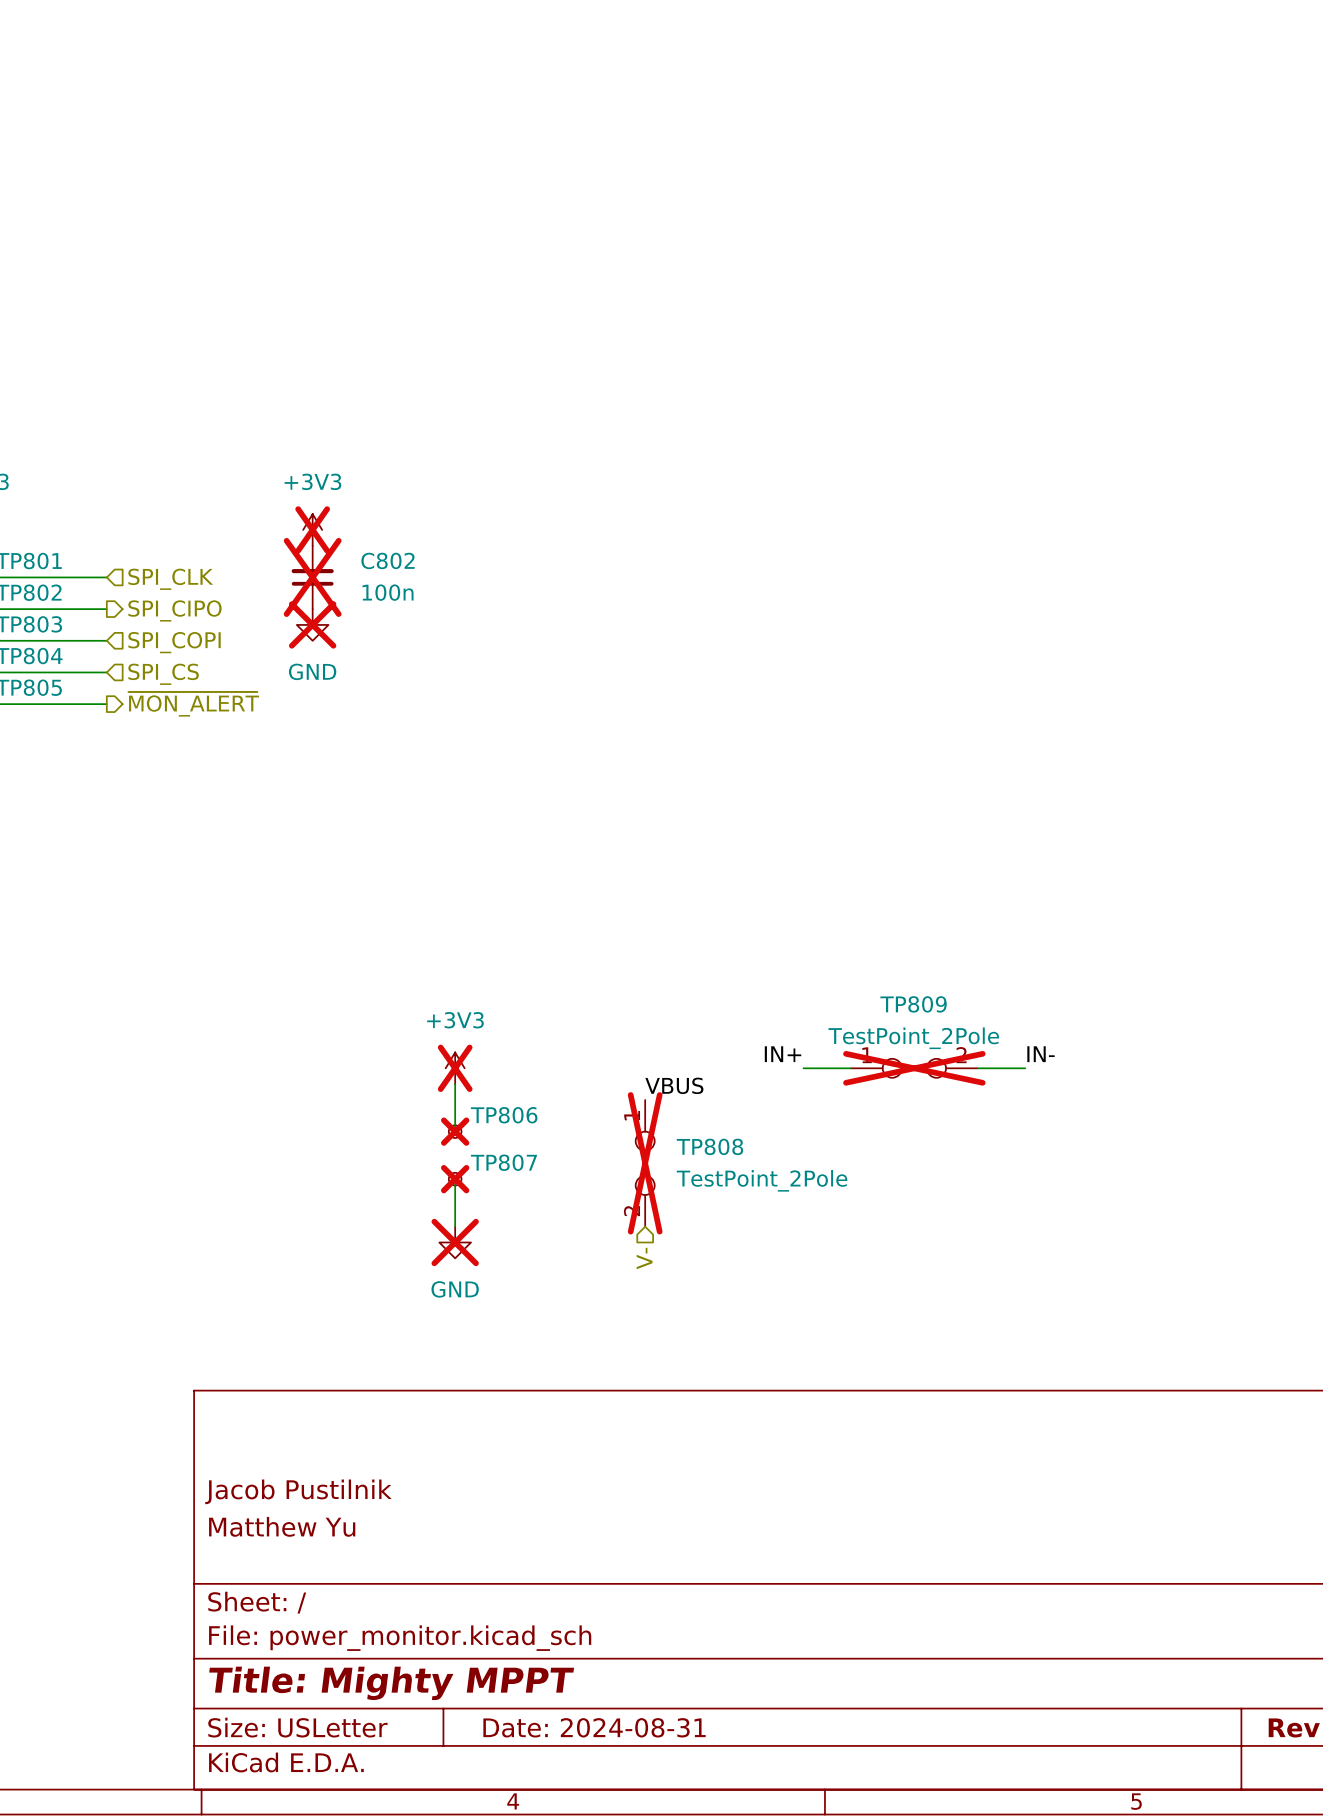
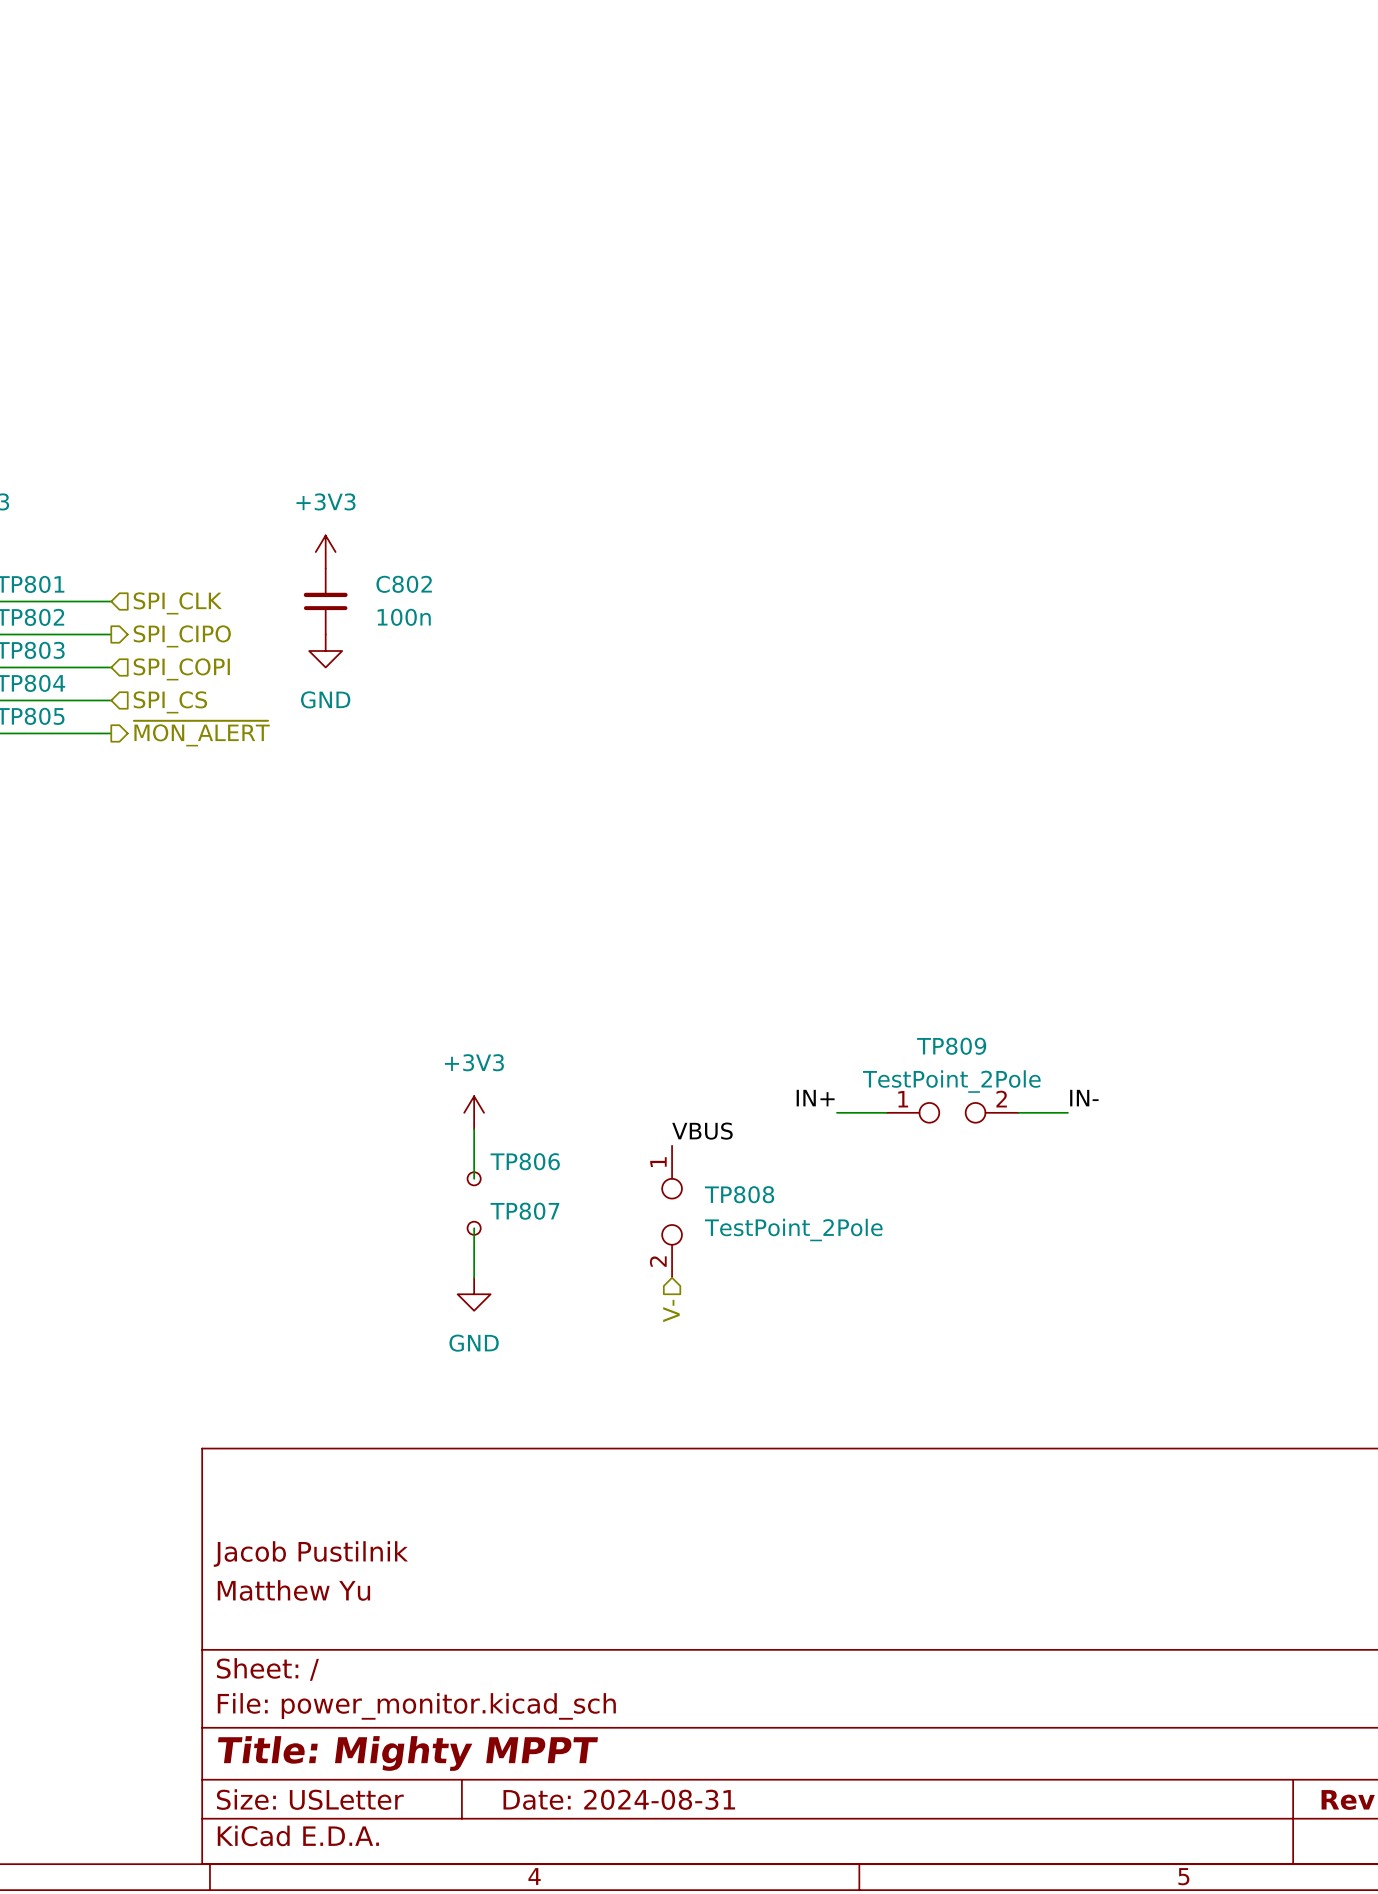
power symbol do-not-place cross: (312, 529) -> none
C802 do-not-place cross: (312, 577) -> none
power symbol do-not-place cross: (312, 624) -> none
power symbol do-not-place cross: (455, 1068) -> none
TP809 do-not-place cross: (914, 1068) -> none
TP806 do-not-place cross: (455, 1131) -> none
TP808 do-not-place cross: (645, 1163) -> none
TP807 do-not-place cross: (455, 1179) -> none
power symbol do-not-place cross: (455, 1242) -> none

